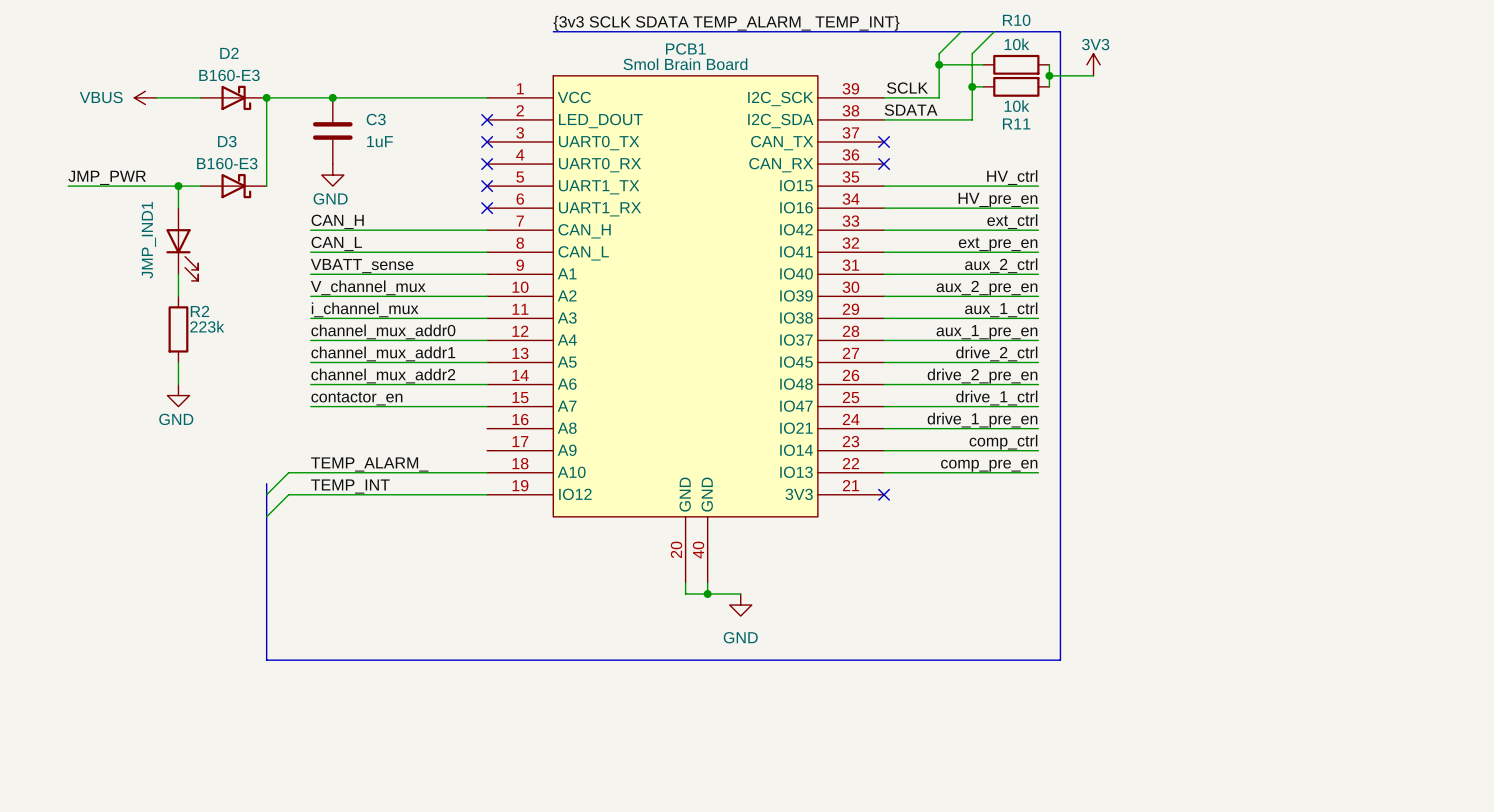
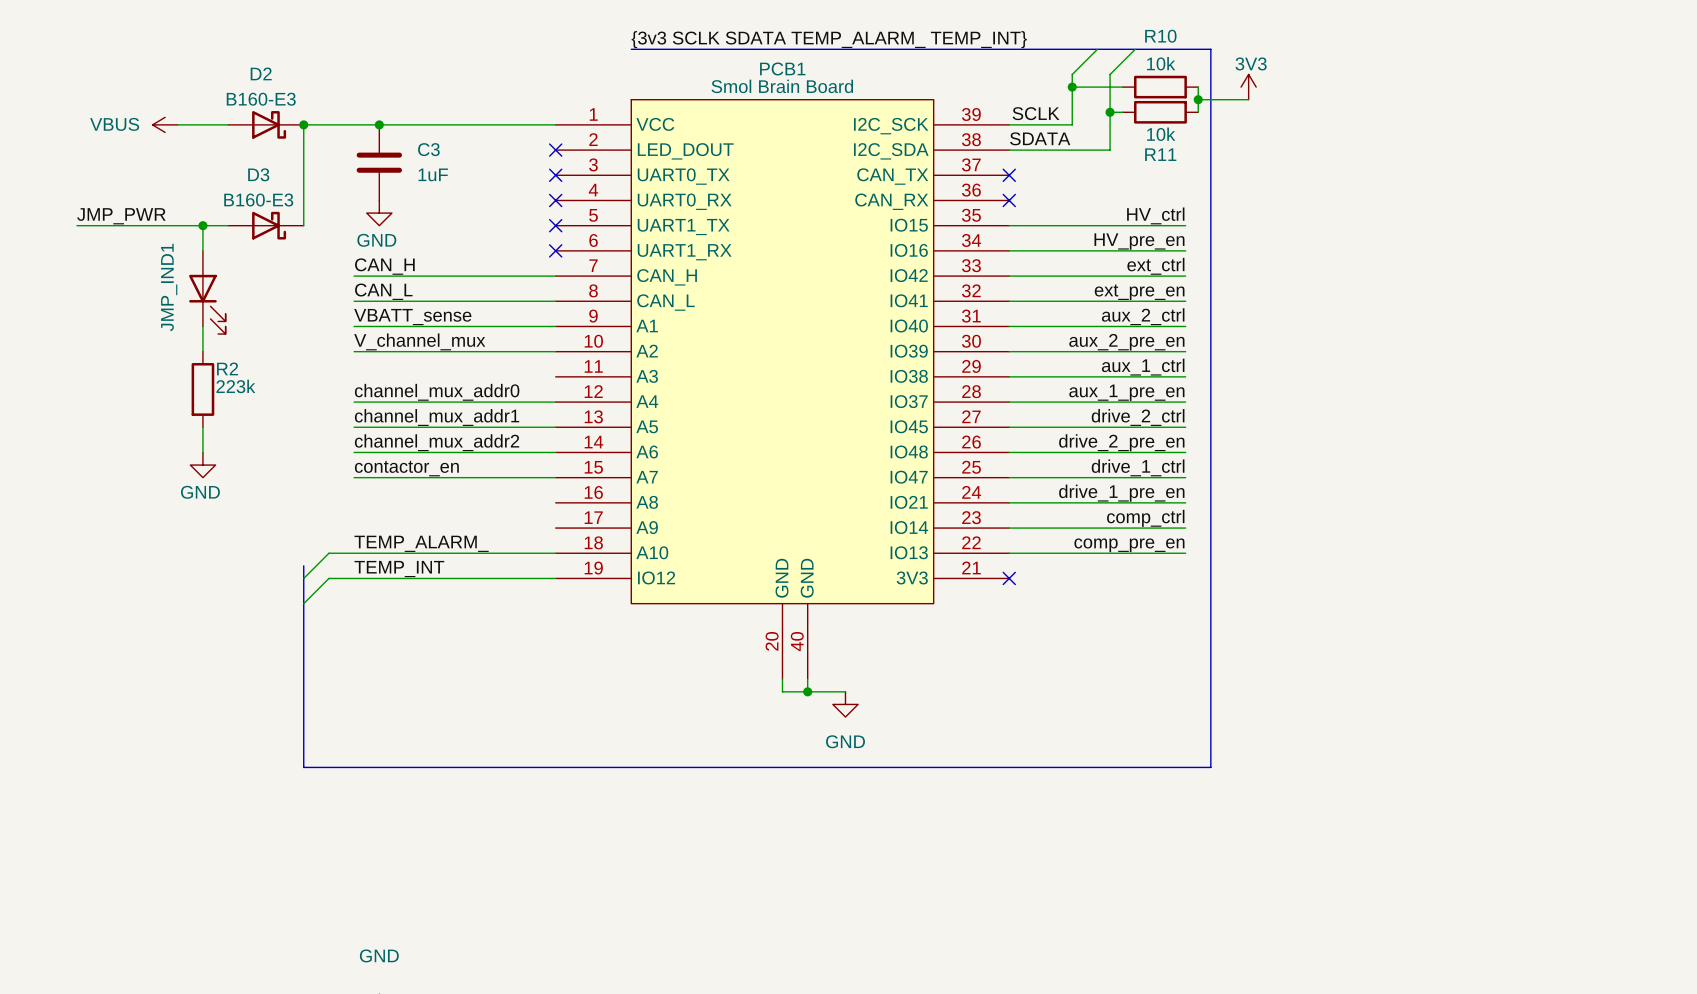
label: i_channel_mux (365, 309) -> none
wire: (310, 318) (487, 318) -> none

